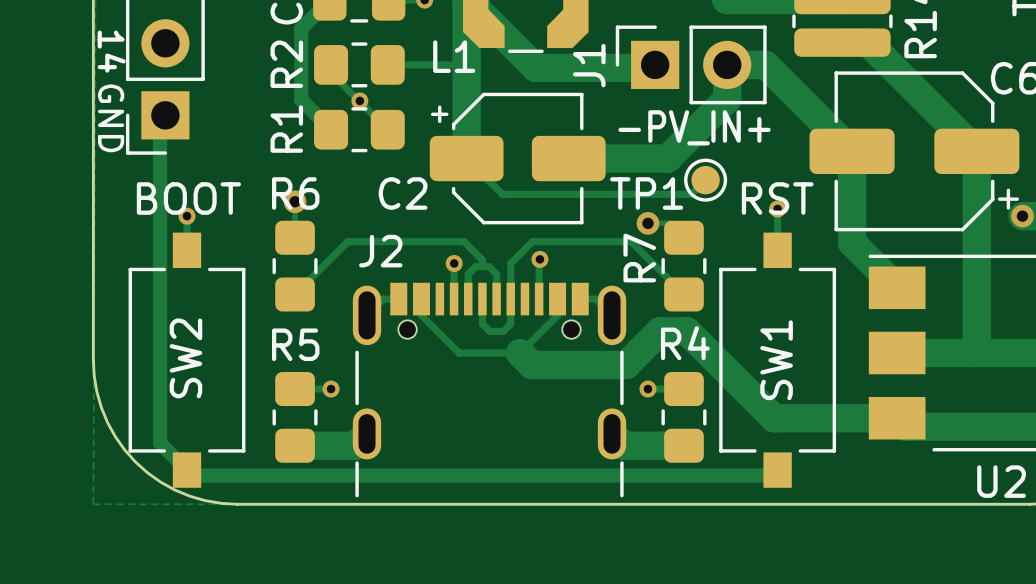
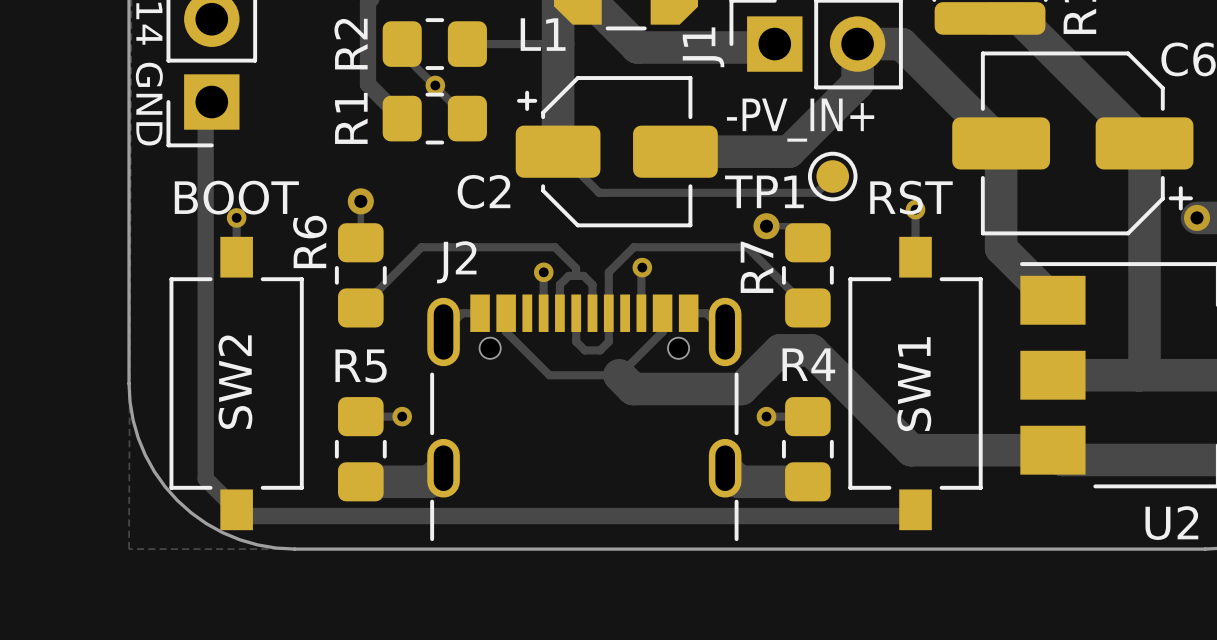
R6 name rotation: 0° (295, 193) -> 90° counterclockwise (309, 241)

